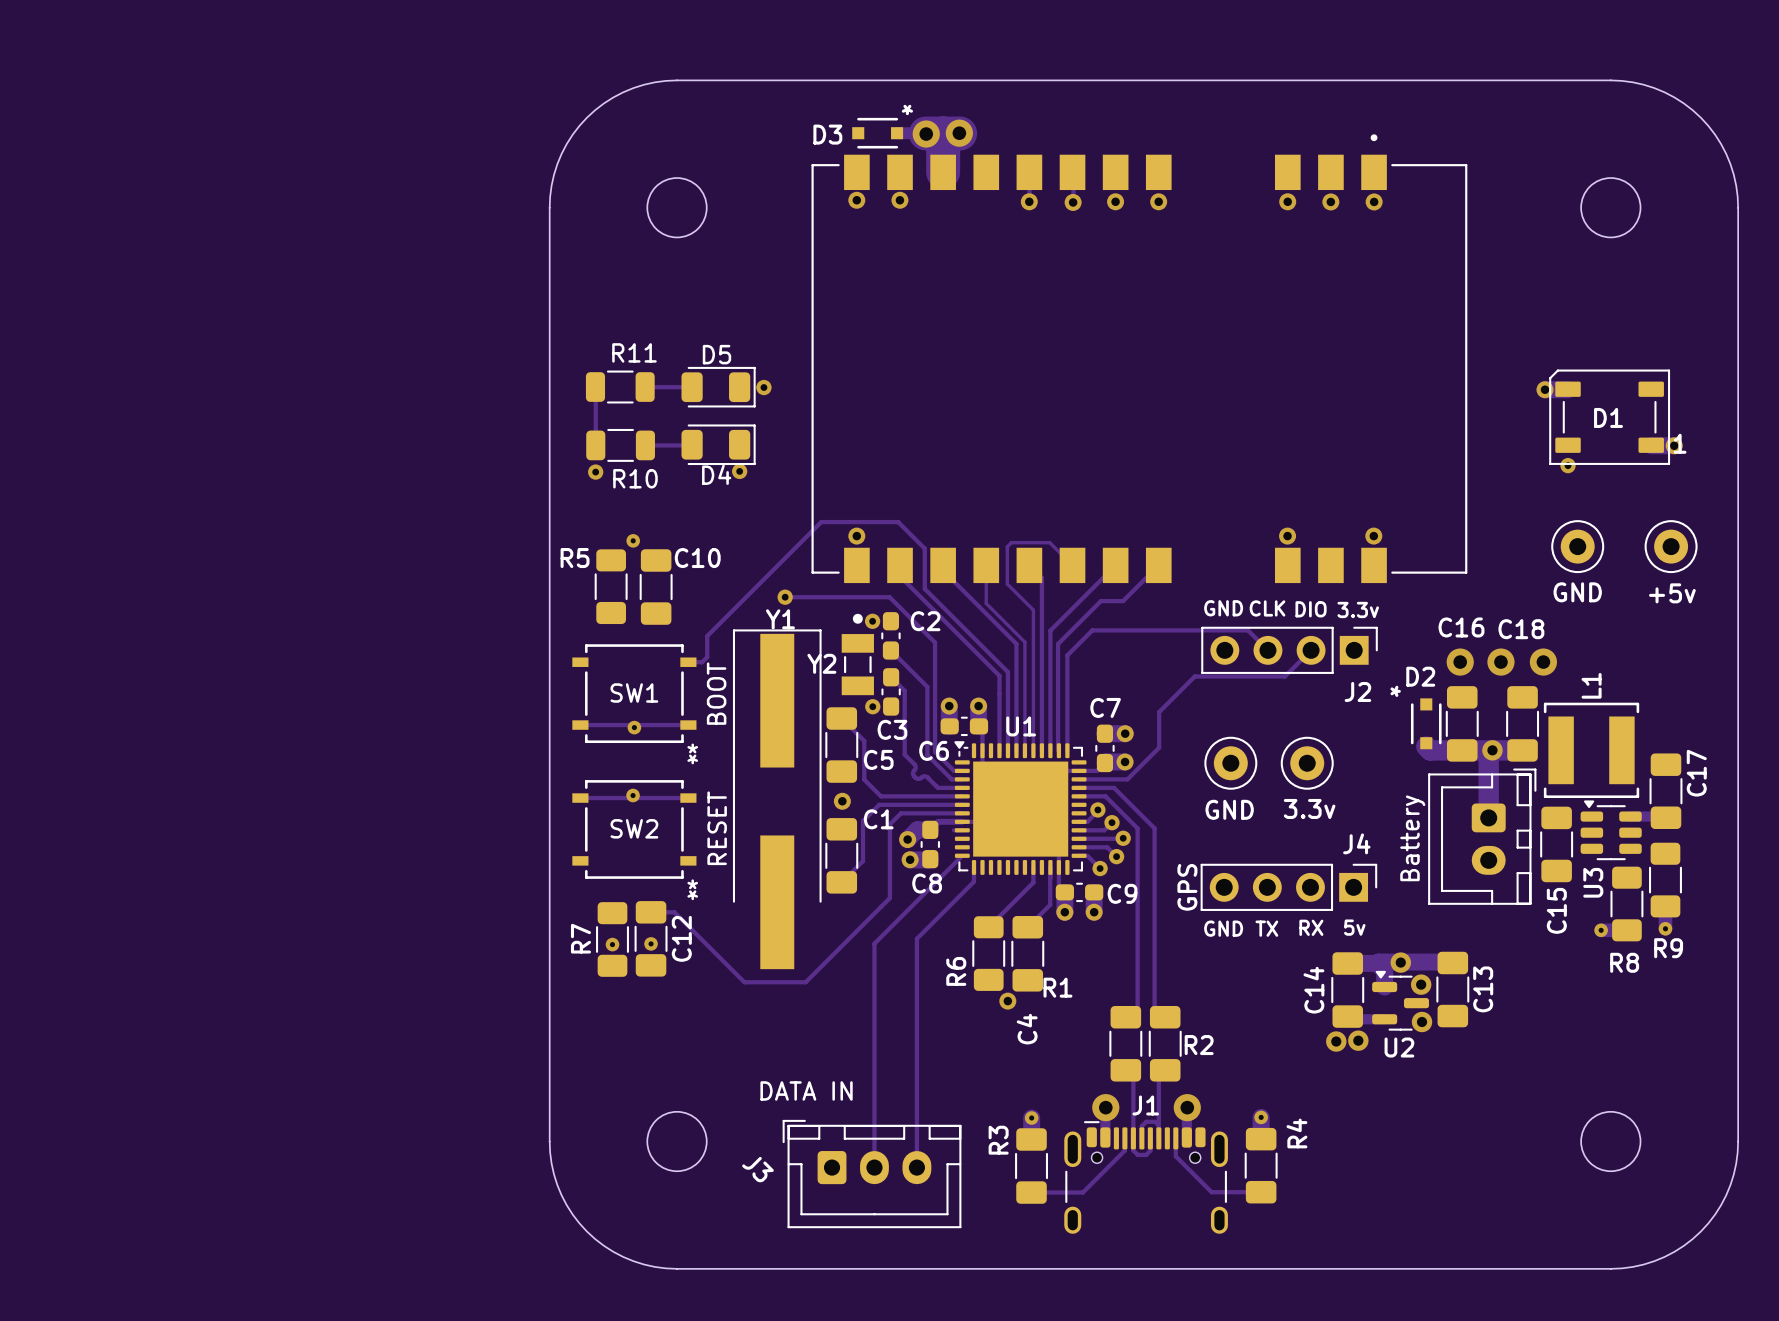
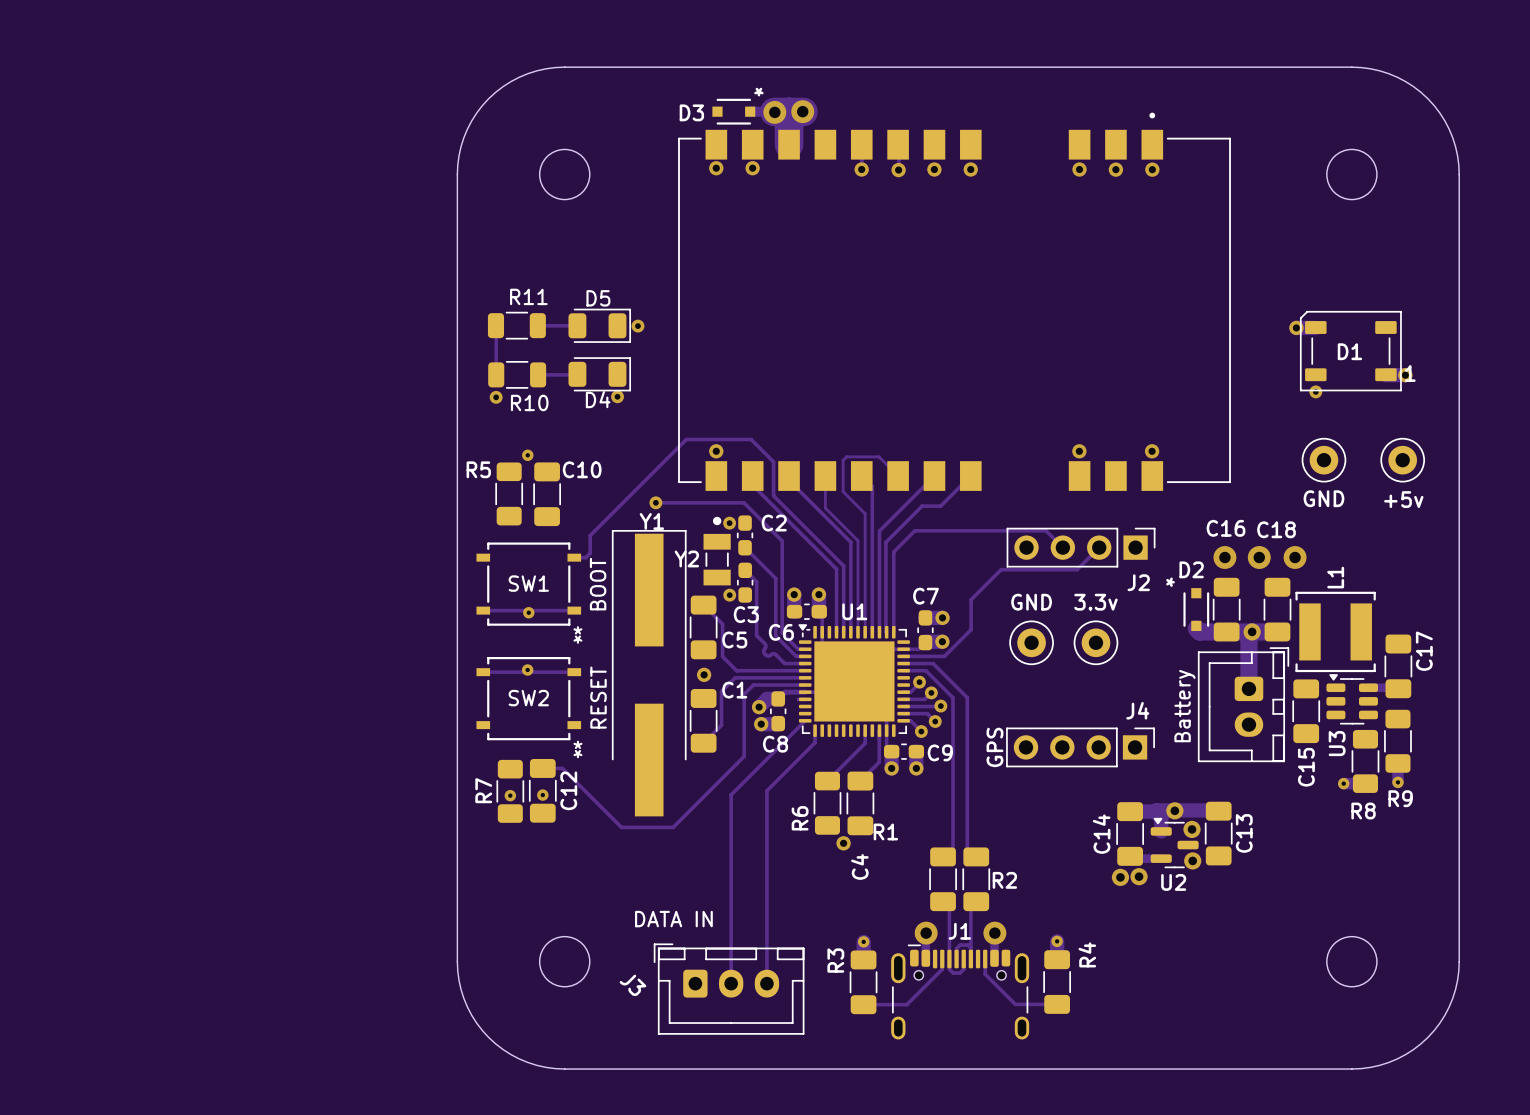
text: GND (1223, 608) -> none
text: CLK (1267, 608) -> none
text: DIO (1311, 609) -> none
text: 3.3v (1358, 609) -> none
part value position: 3.3v (1309, 808) -> 3.3v (1095, 602)
part value position: GND (1229, 809) -> GND (1031, 602)
text: RX (1311, 927) -> none
text: 5v (1354, 927) -> none
text: GND (1223, 928) -> none
text: TX (1266, 928) -> none

